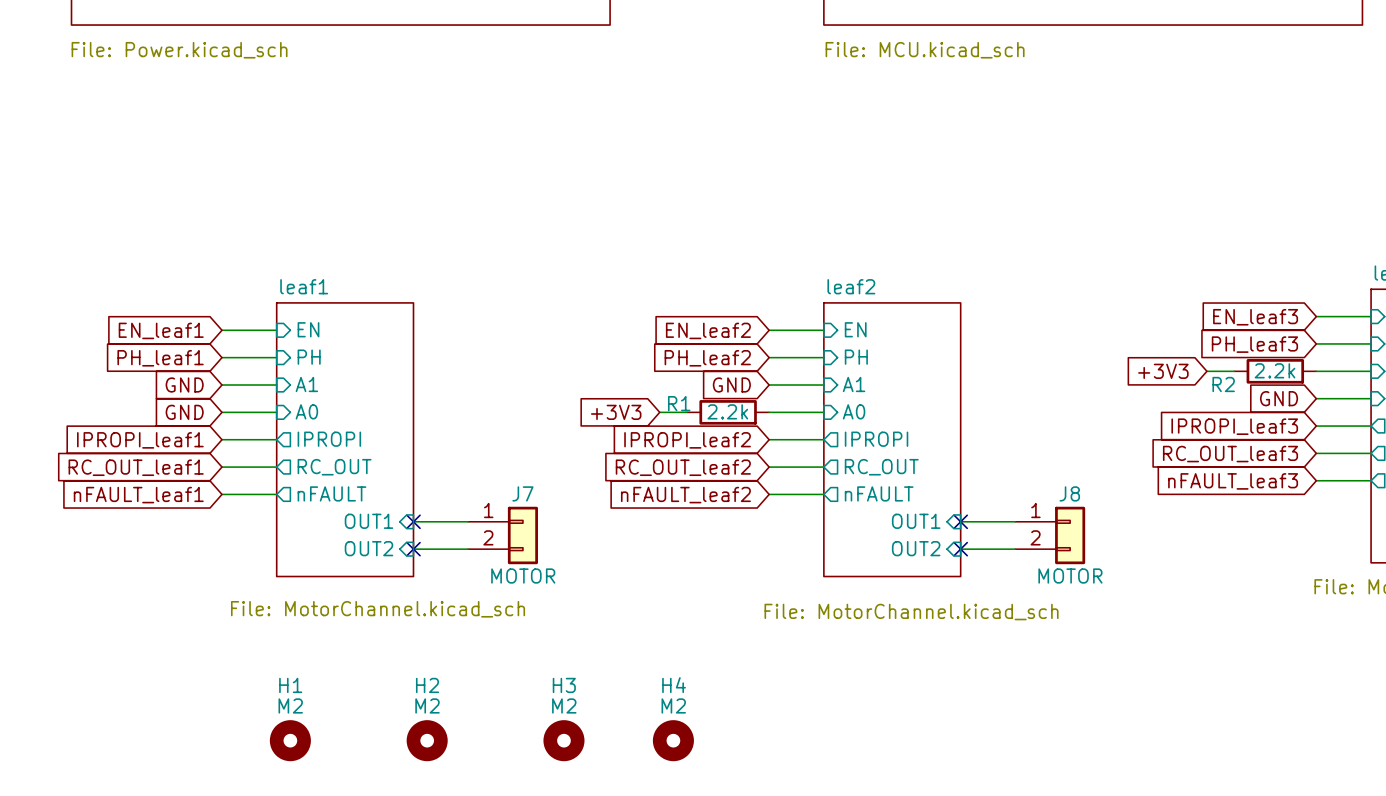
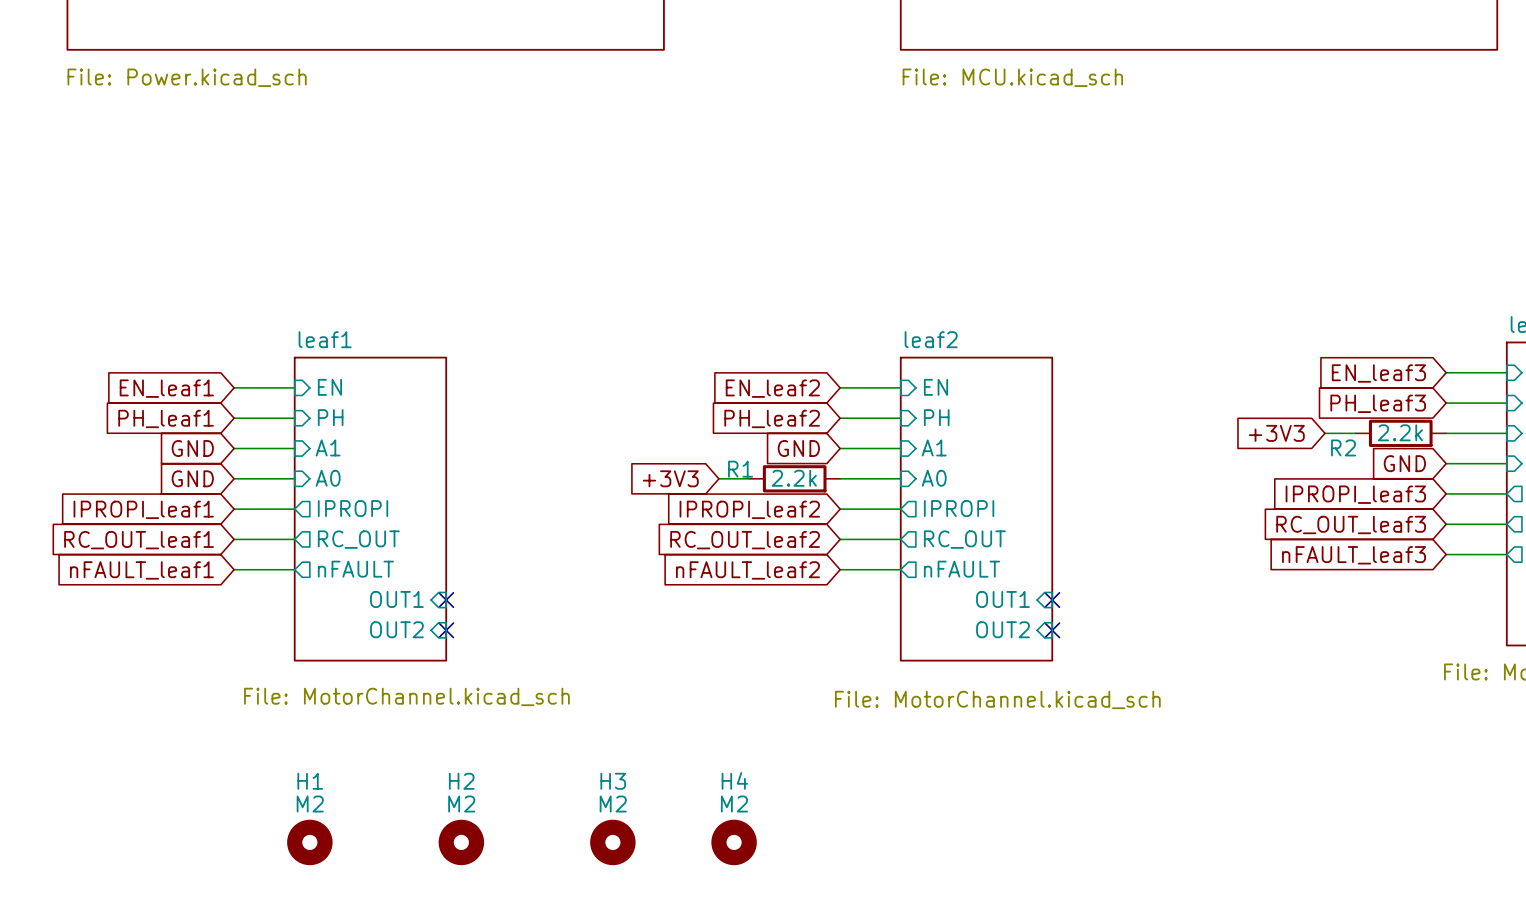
wire: (413, 521) (468, 521) -> none
wire: (960, 521) (1015, 521) -> none
J7: MOTOR (503, 535) -> none
J8: MOTOR (1050, 535) -> none
wire: (413, 549) (468, 549) -> none
wire: (960, 549) (1015, 549) -> none

